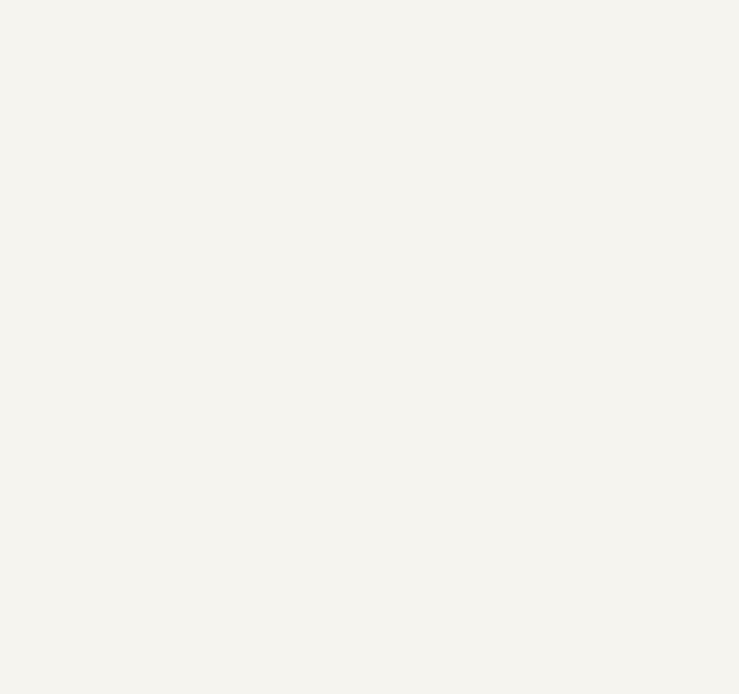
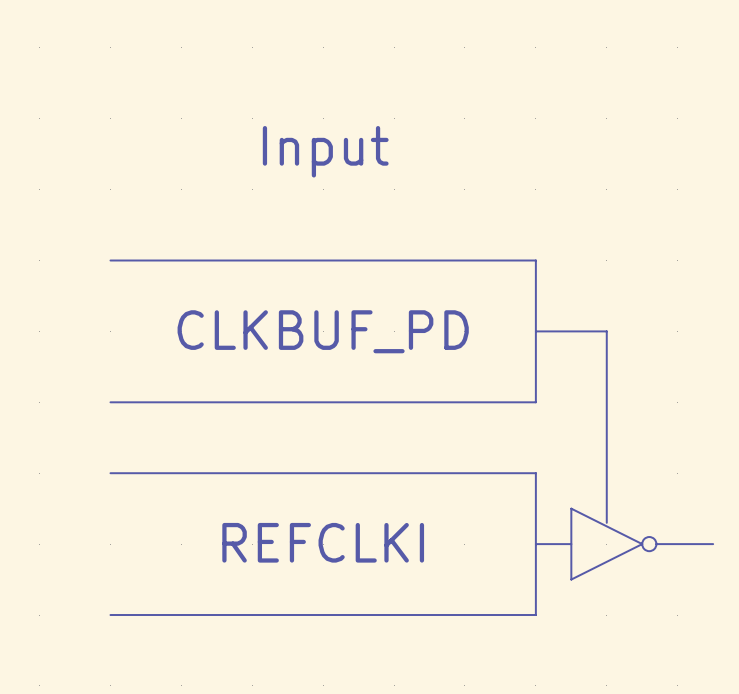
text: none -> Input (325, 151)
line: none -> (110, 260) (535, 260) (535, 402) (110, 402)
text: none -> CLKBUF_PD (323, 331)
line: none -> (535, 331) (606, 331) (606, 522)
line: none -> (110, 473) (535, 473) (535, 615) (110, 615)
line: none -> (571, 508) (571, 579) (642, 544) (571, 508)
drawing: none -> [642, 537, 657, 552]
text: none -> REFCLKI (323, 542)
line: none -> (535, 544) (571, 544)
line: none -> (656, 544) (713, 544)

